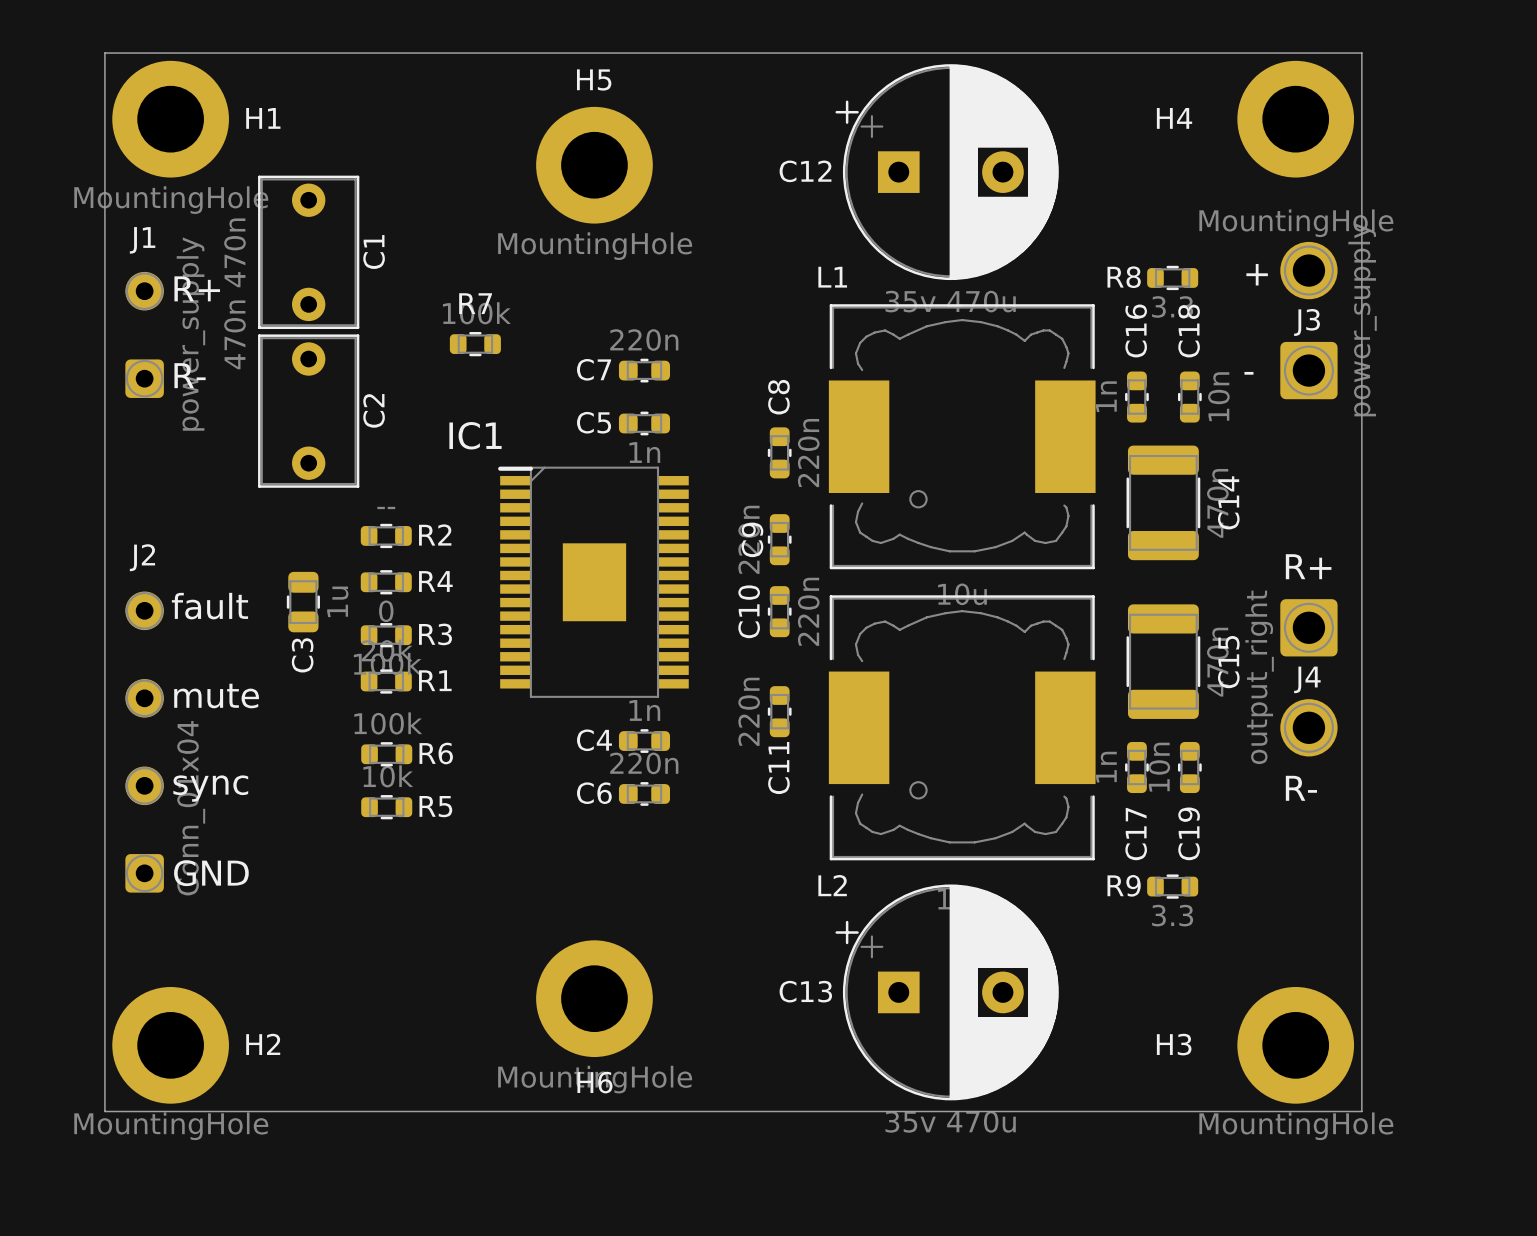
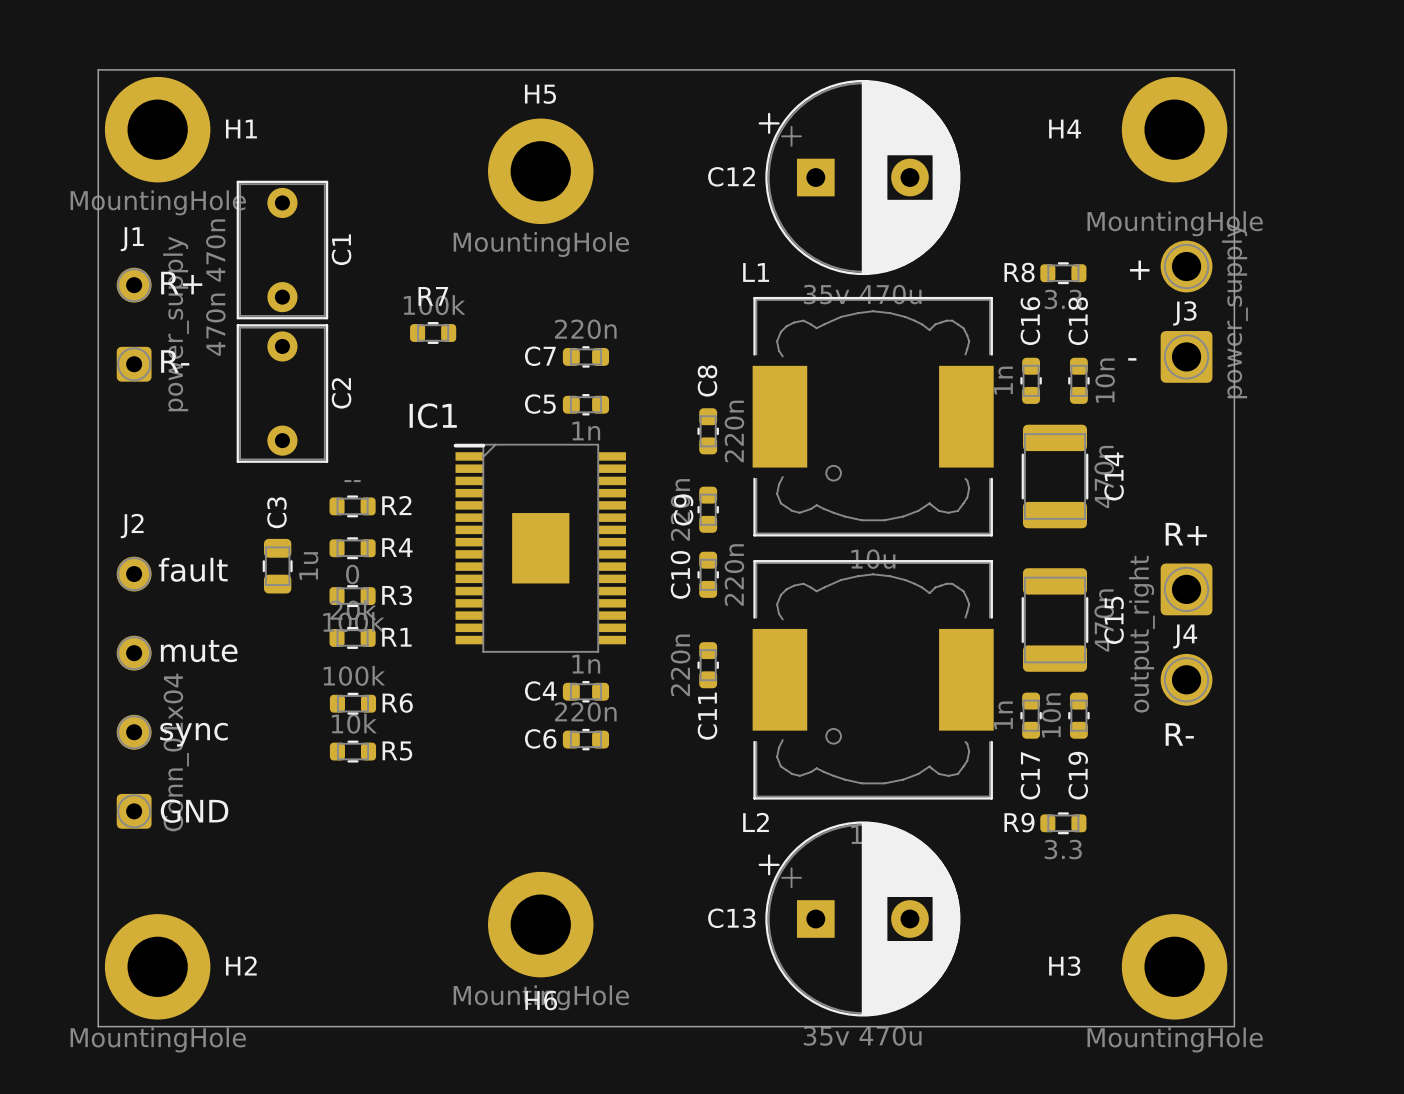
C3 name position: C3 (302, 655) -> C3 (276, 512)

